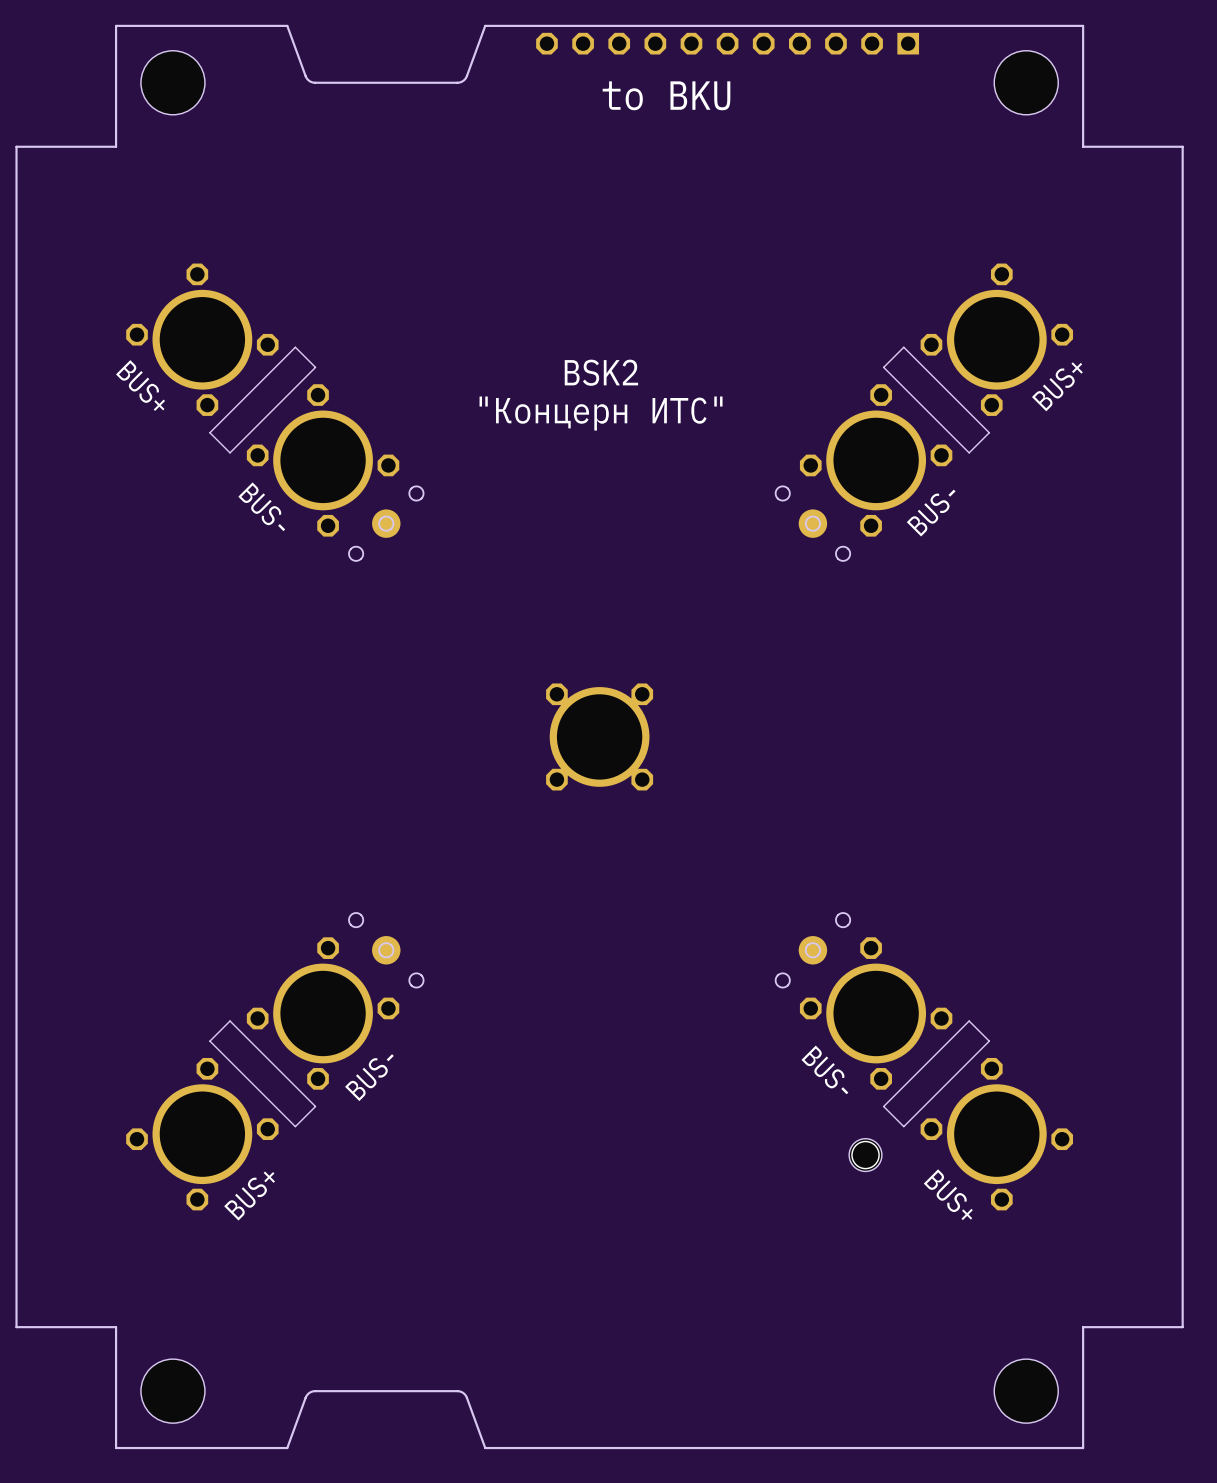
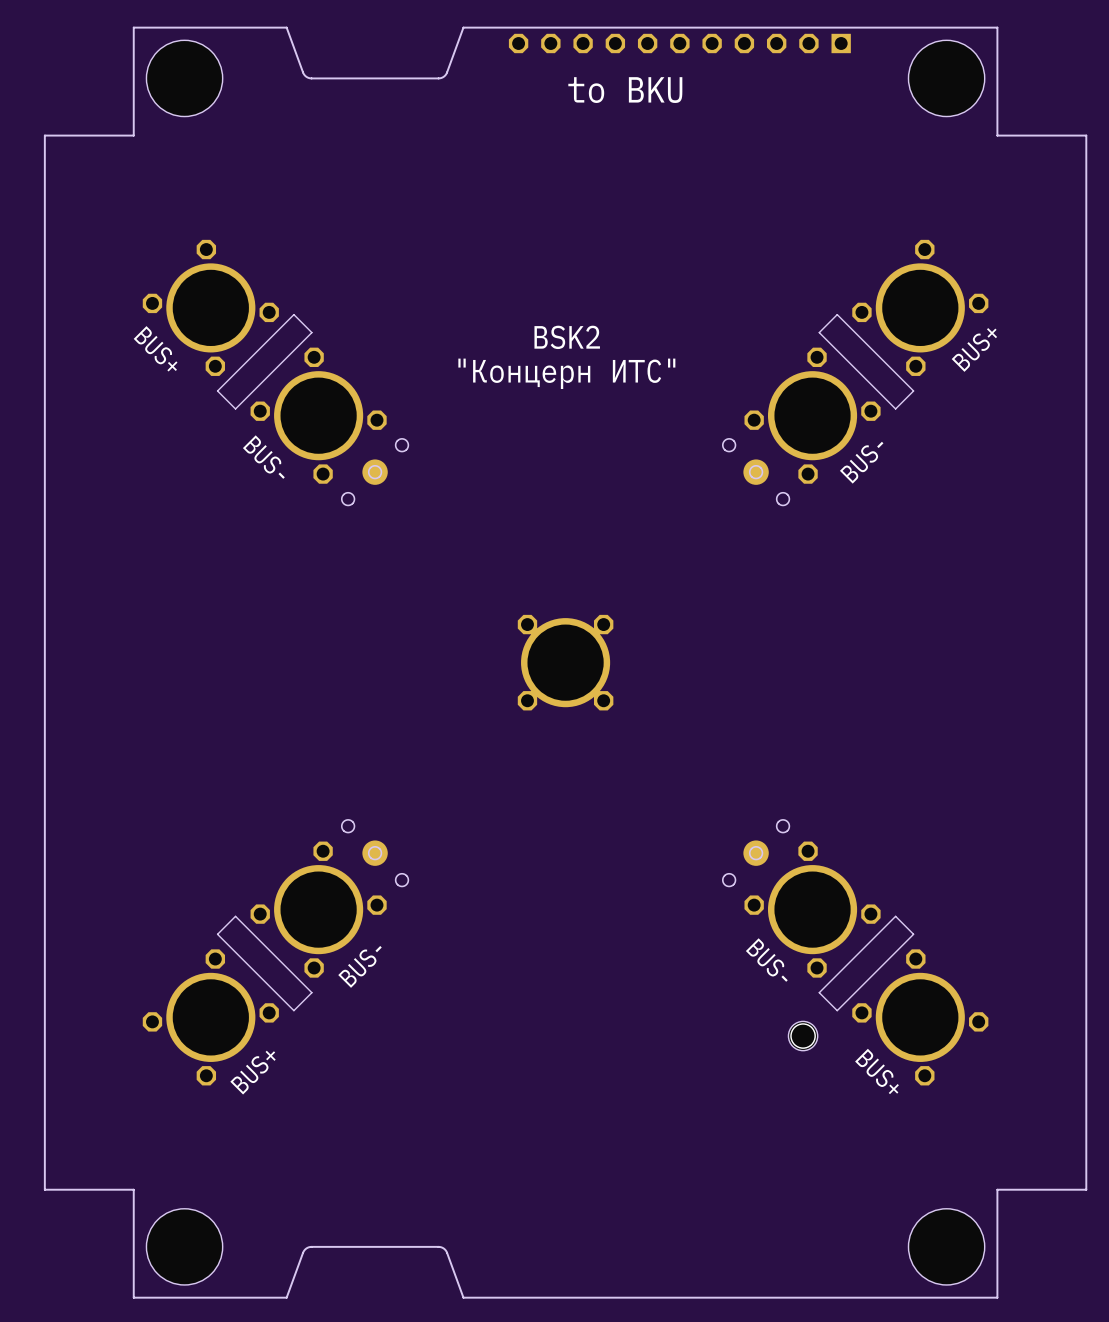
hole size: [140, 50, 205, 115] -> [146, 40, 223, 117]
hole size: [994, 50, 1059, 115] -> [908, 40, 985, 117]
hole size: [140, 1359, 205, 1424] -> [146, 1208, 223, 1285]
hole size: [994, 1359, 1059, 1424] -> [908, 1208, 985, 1285]

